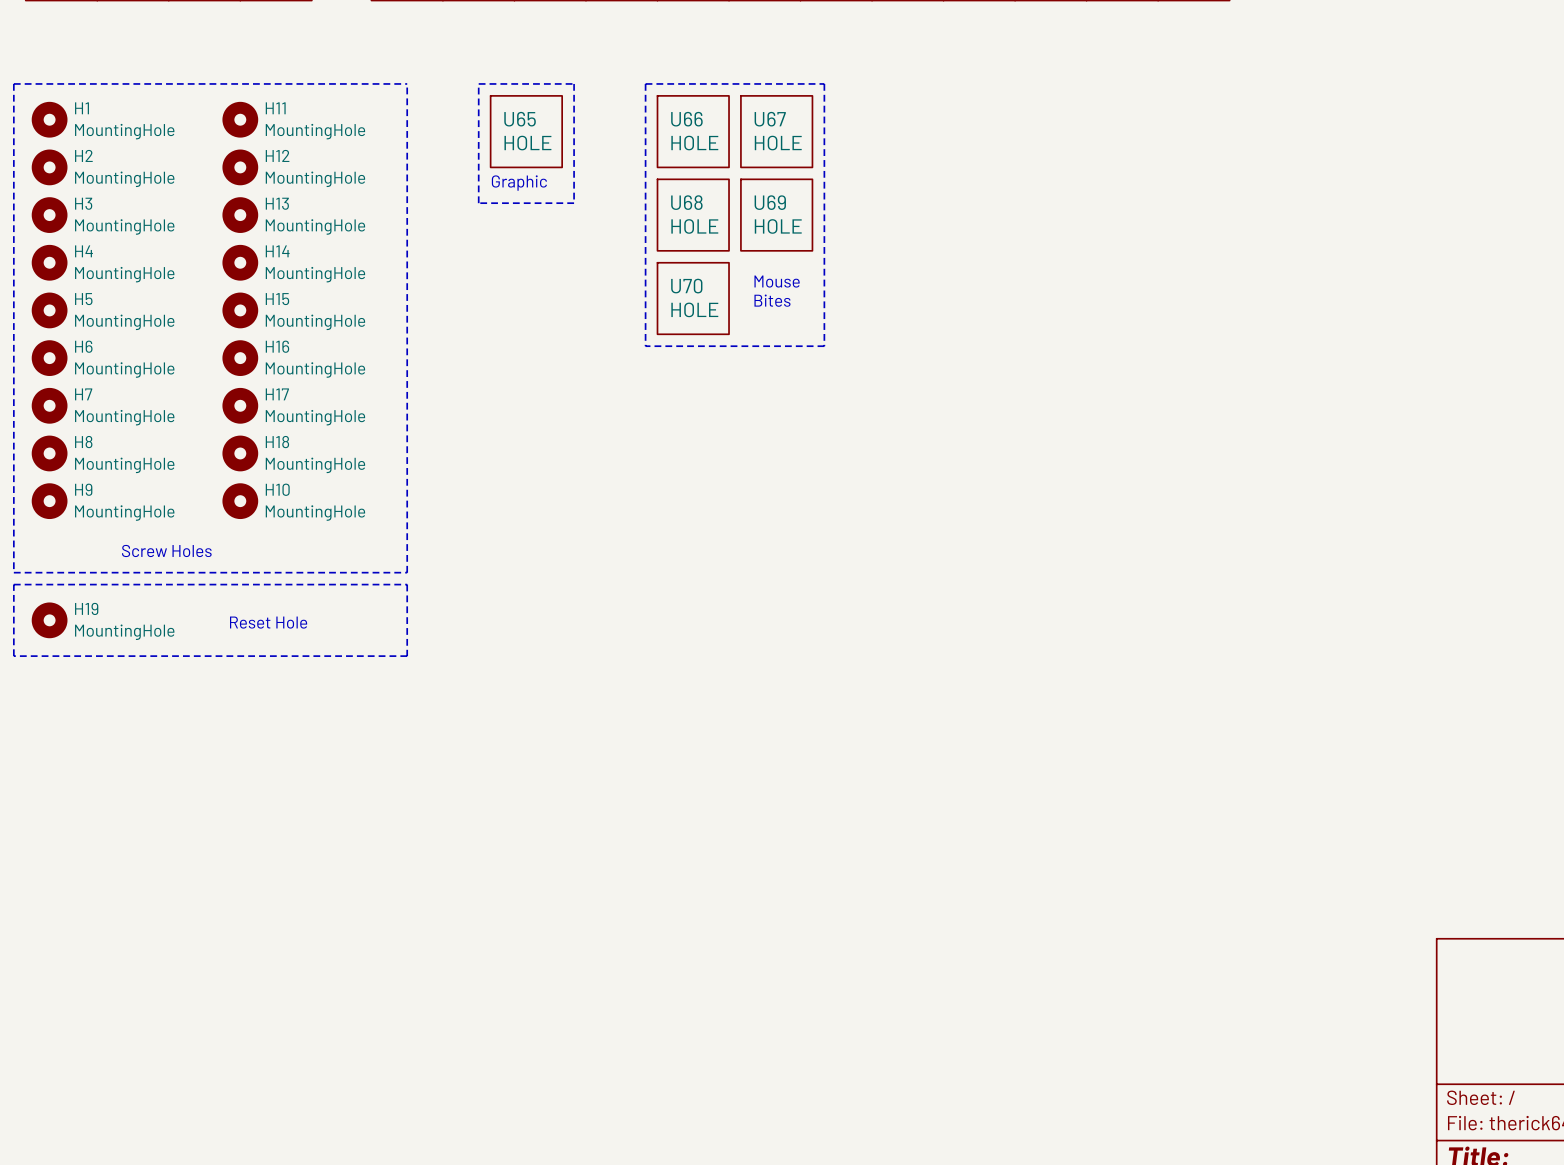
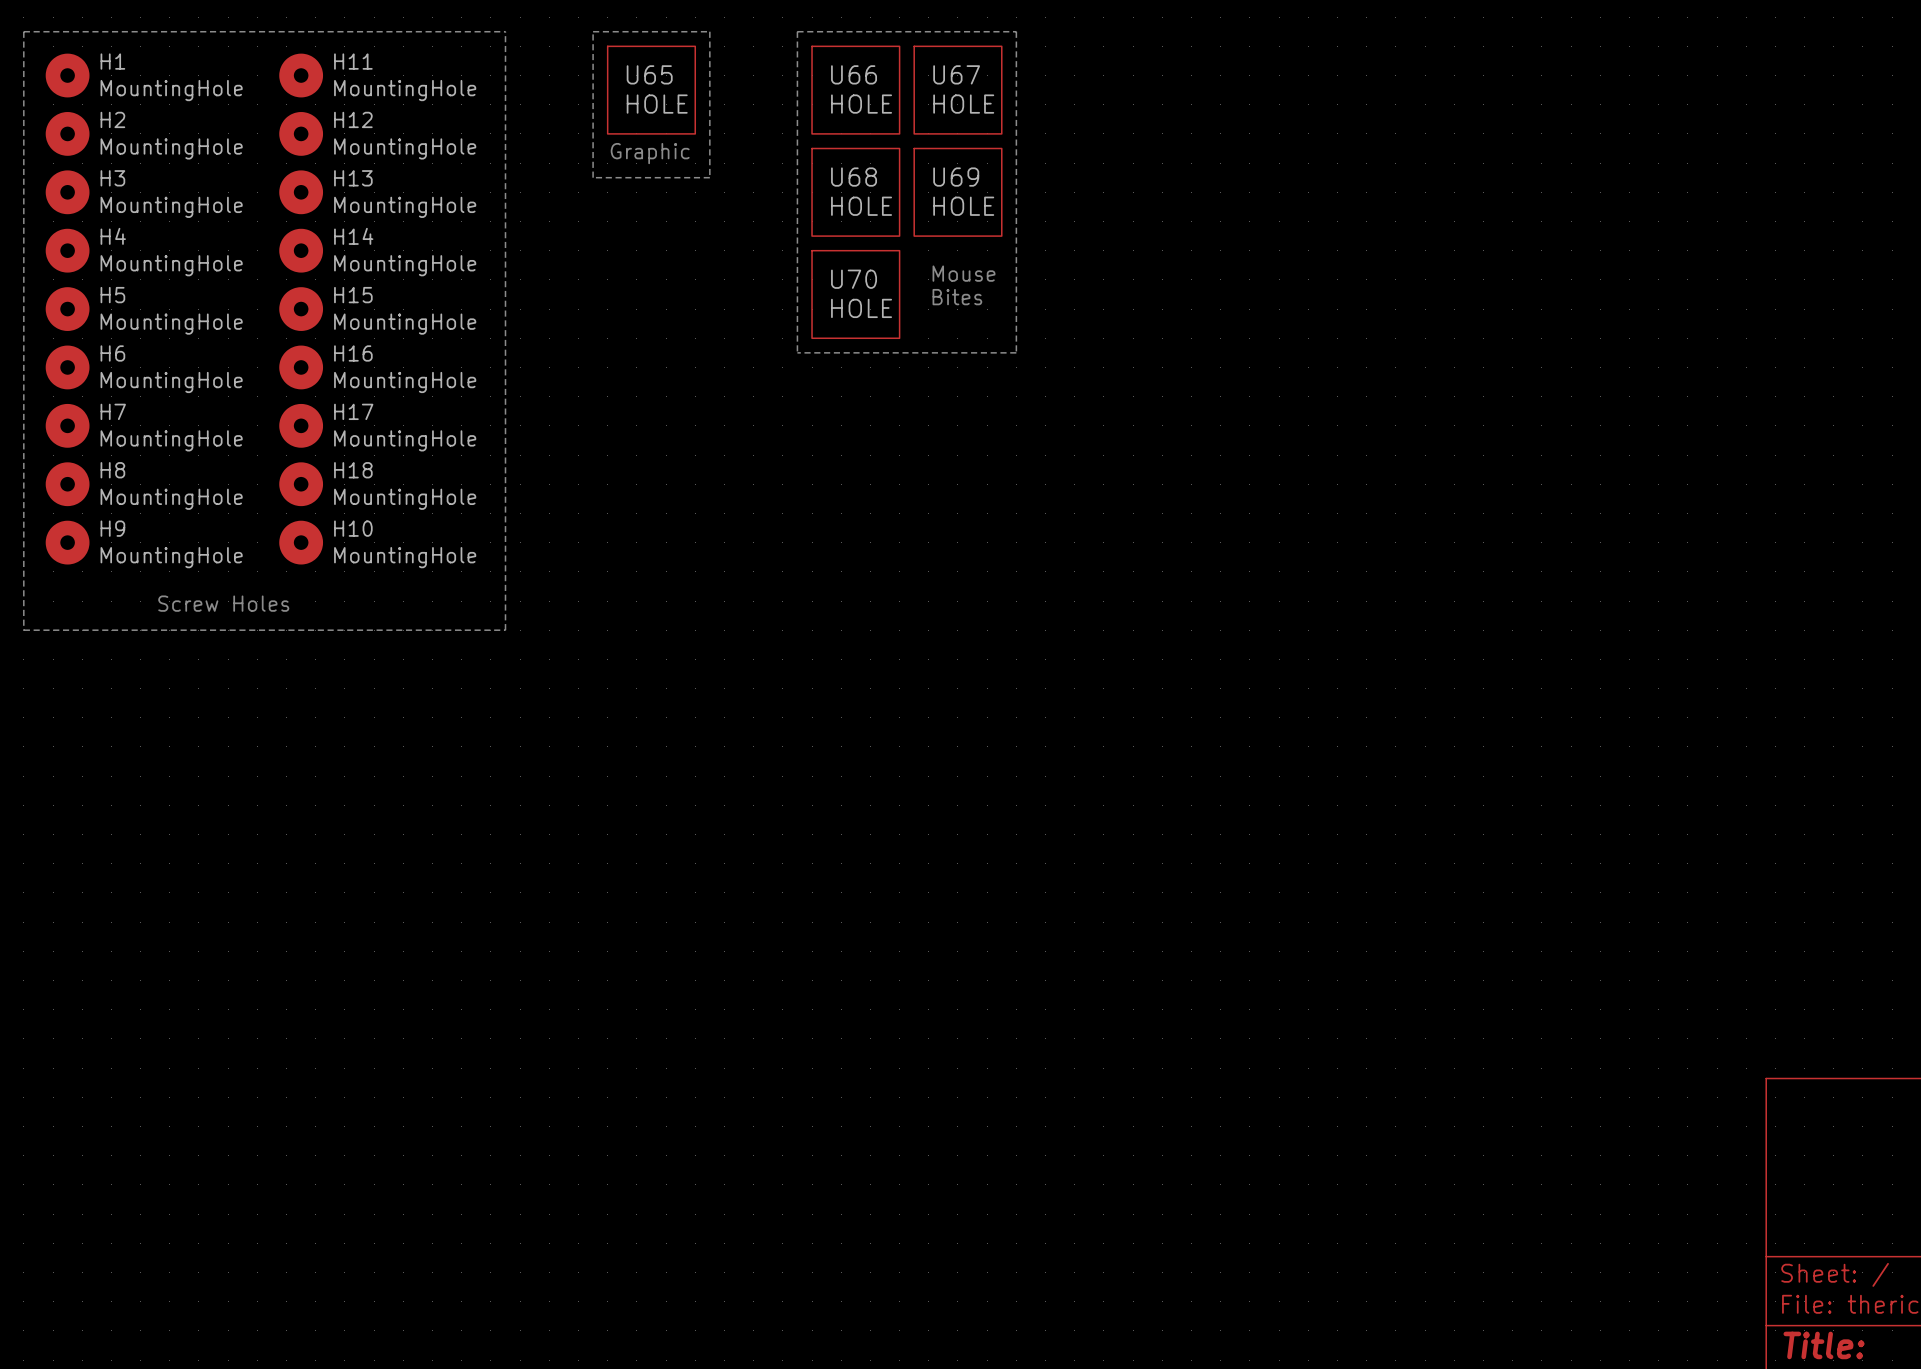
line: (13, 584) (407, 584) (407, 656) (13, 656) (13, 584) -> none
H19: MountingHole (49, 620) -> none
text: Reset Hole (268, 622) -> none

